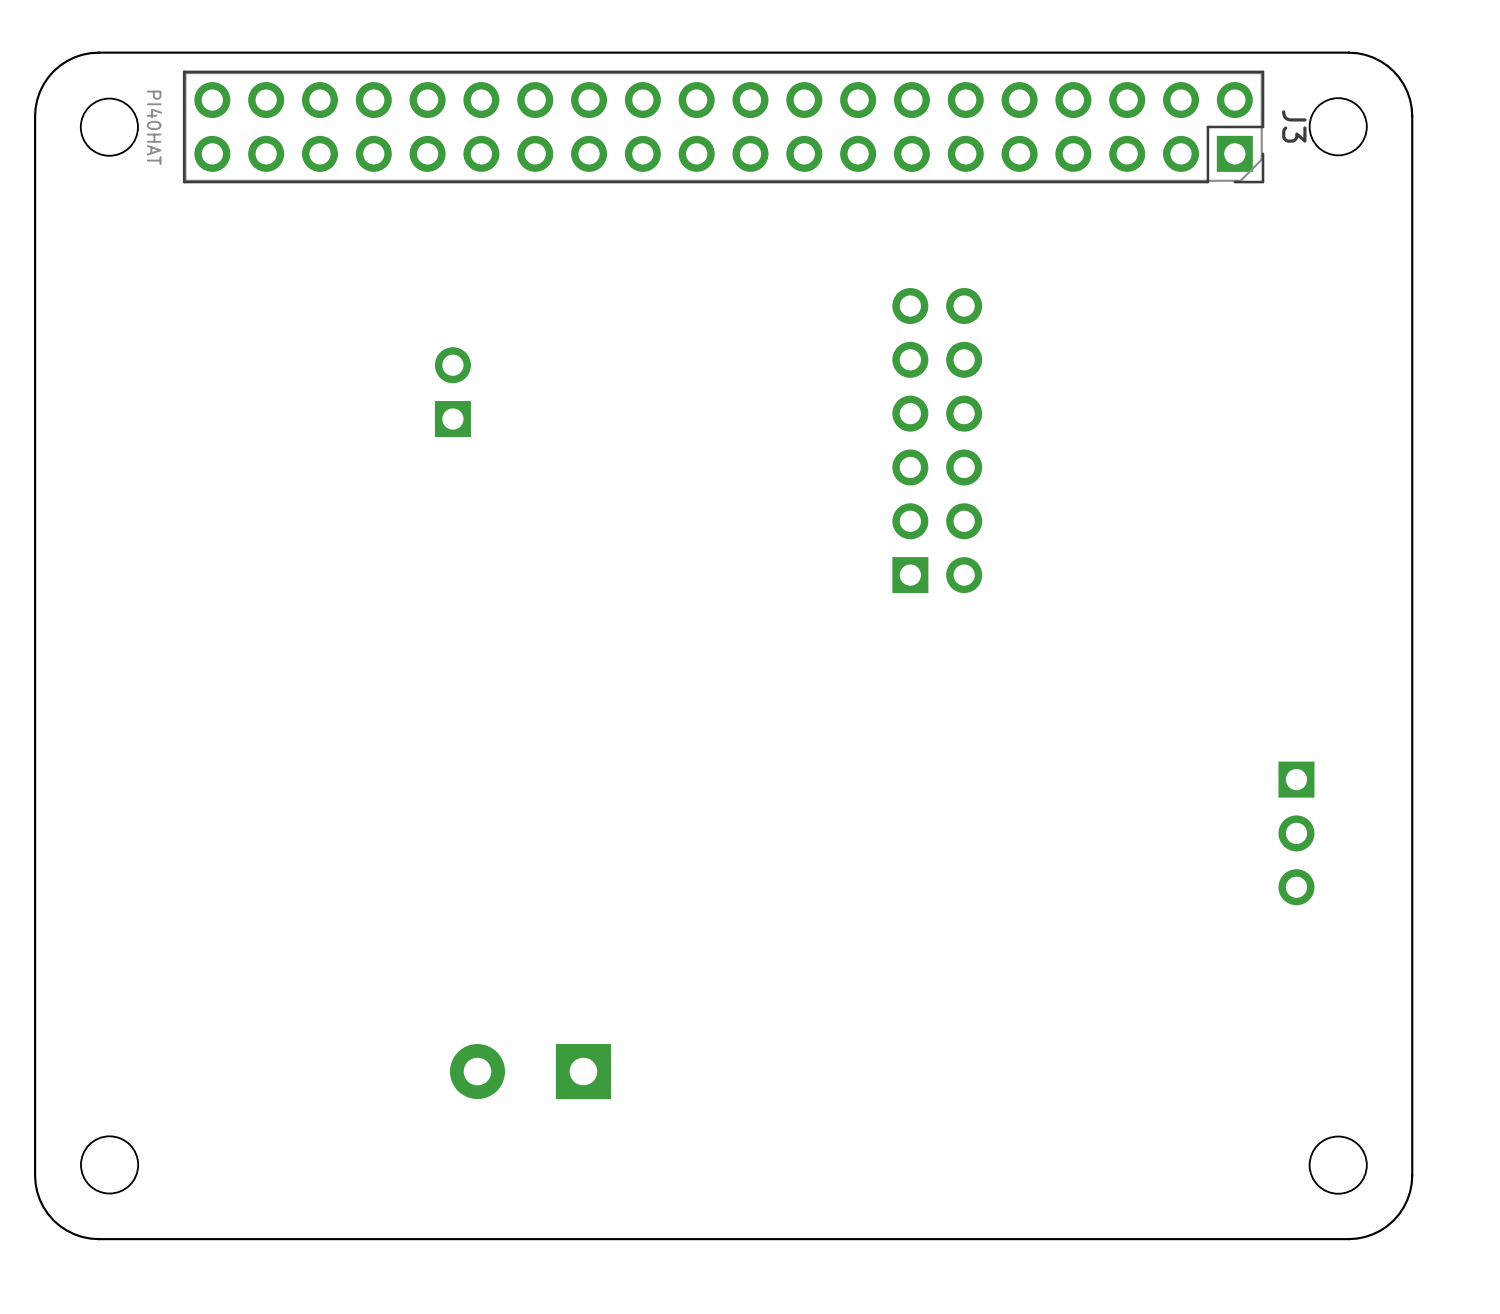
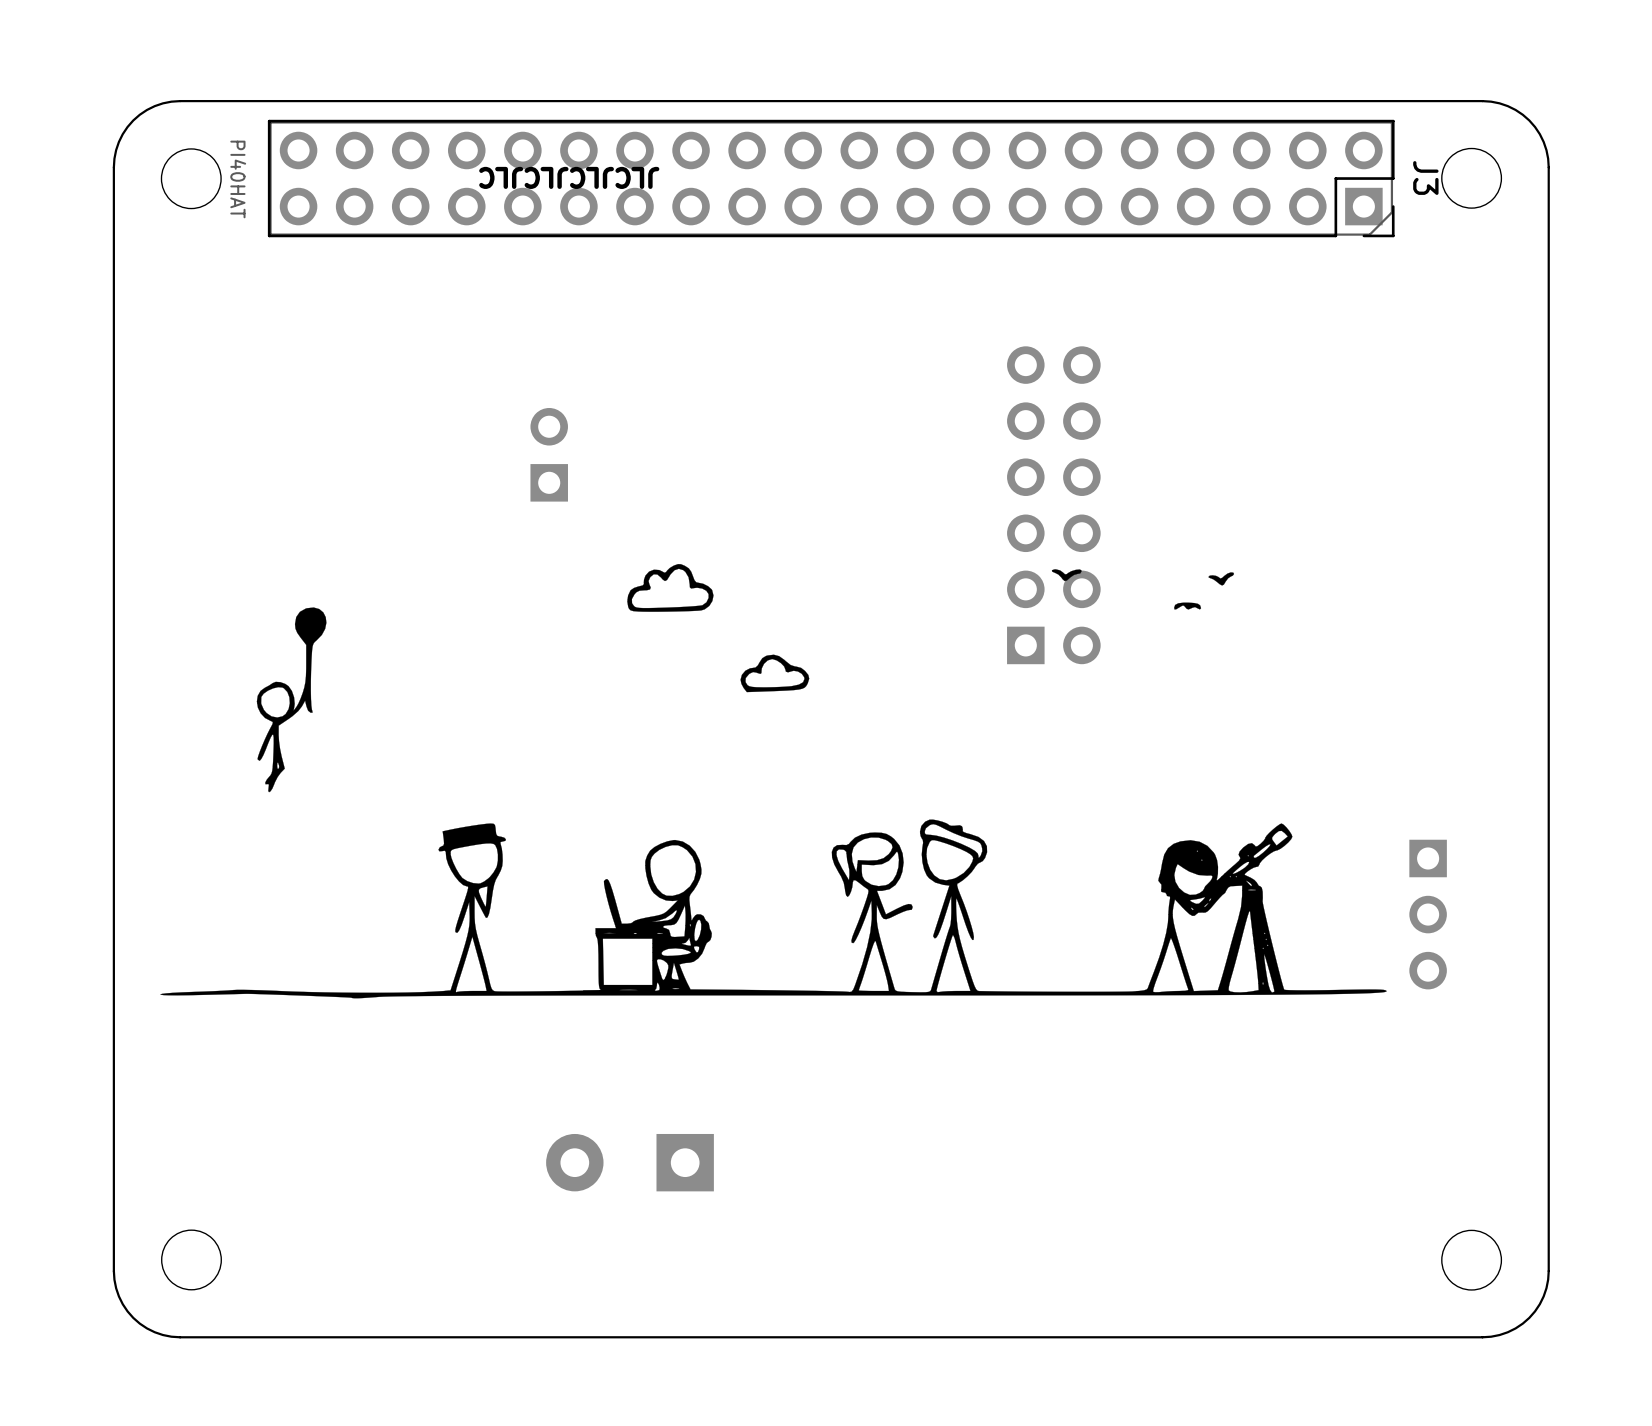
text: none -> JLCJLCJLCJLC (569, 177)
drawing: none -> [160, 564, 1387, 999]

